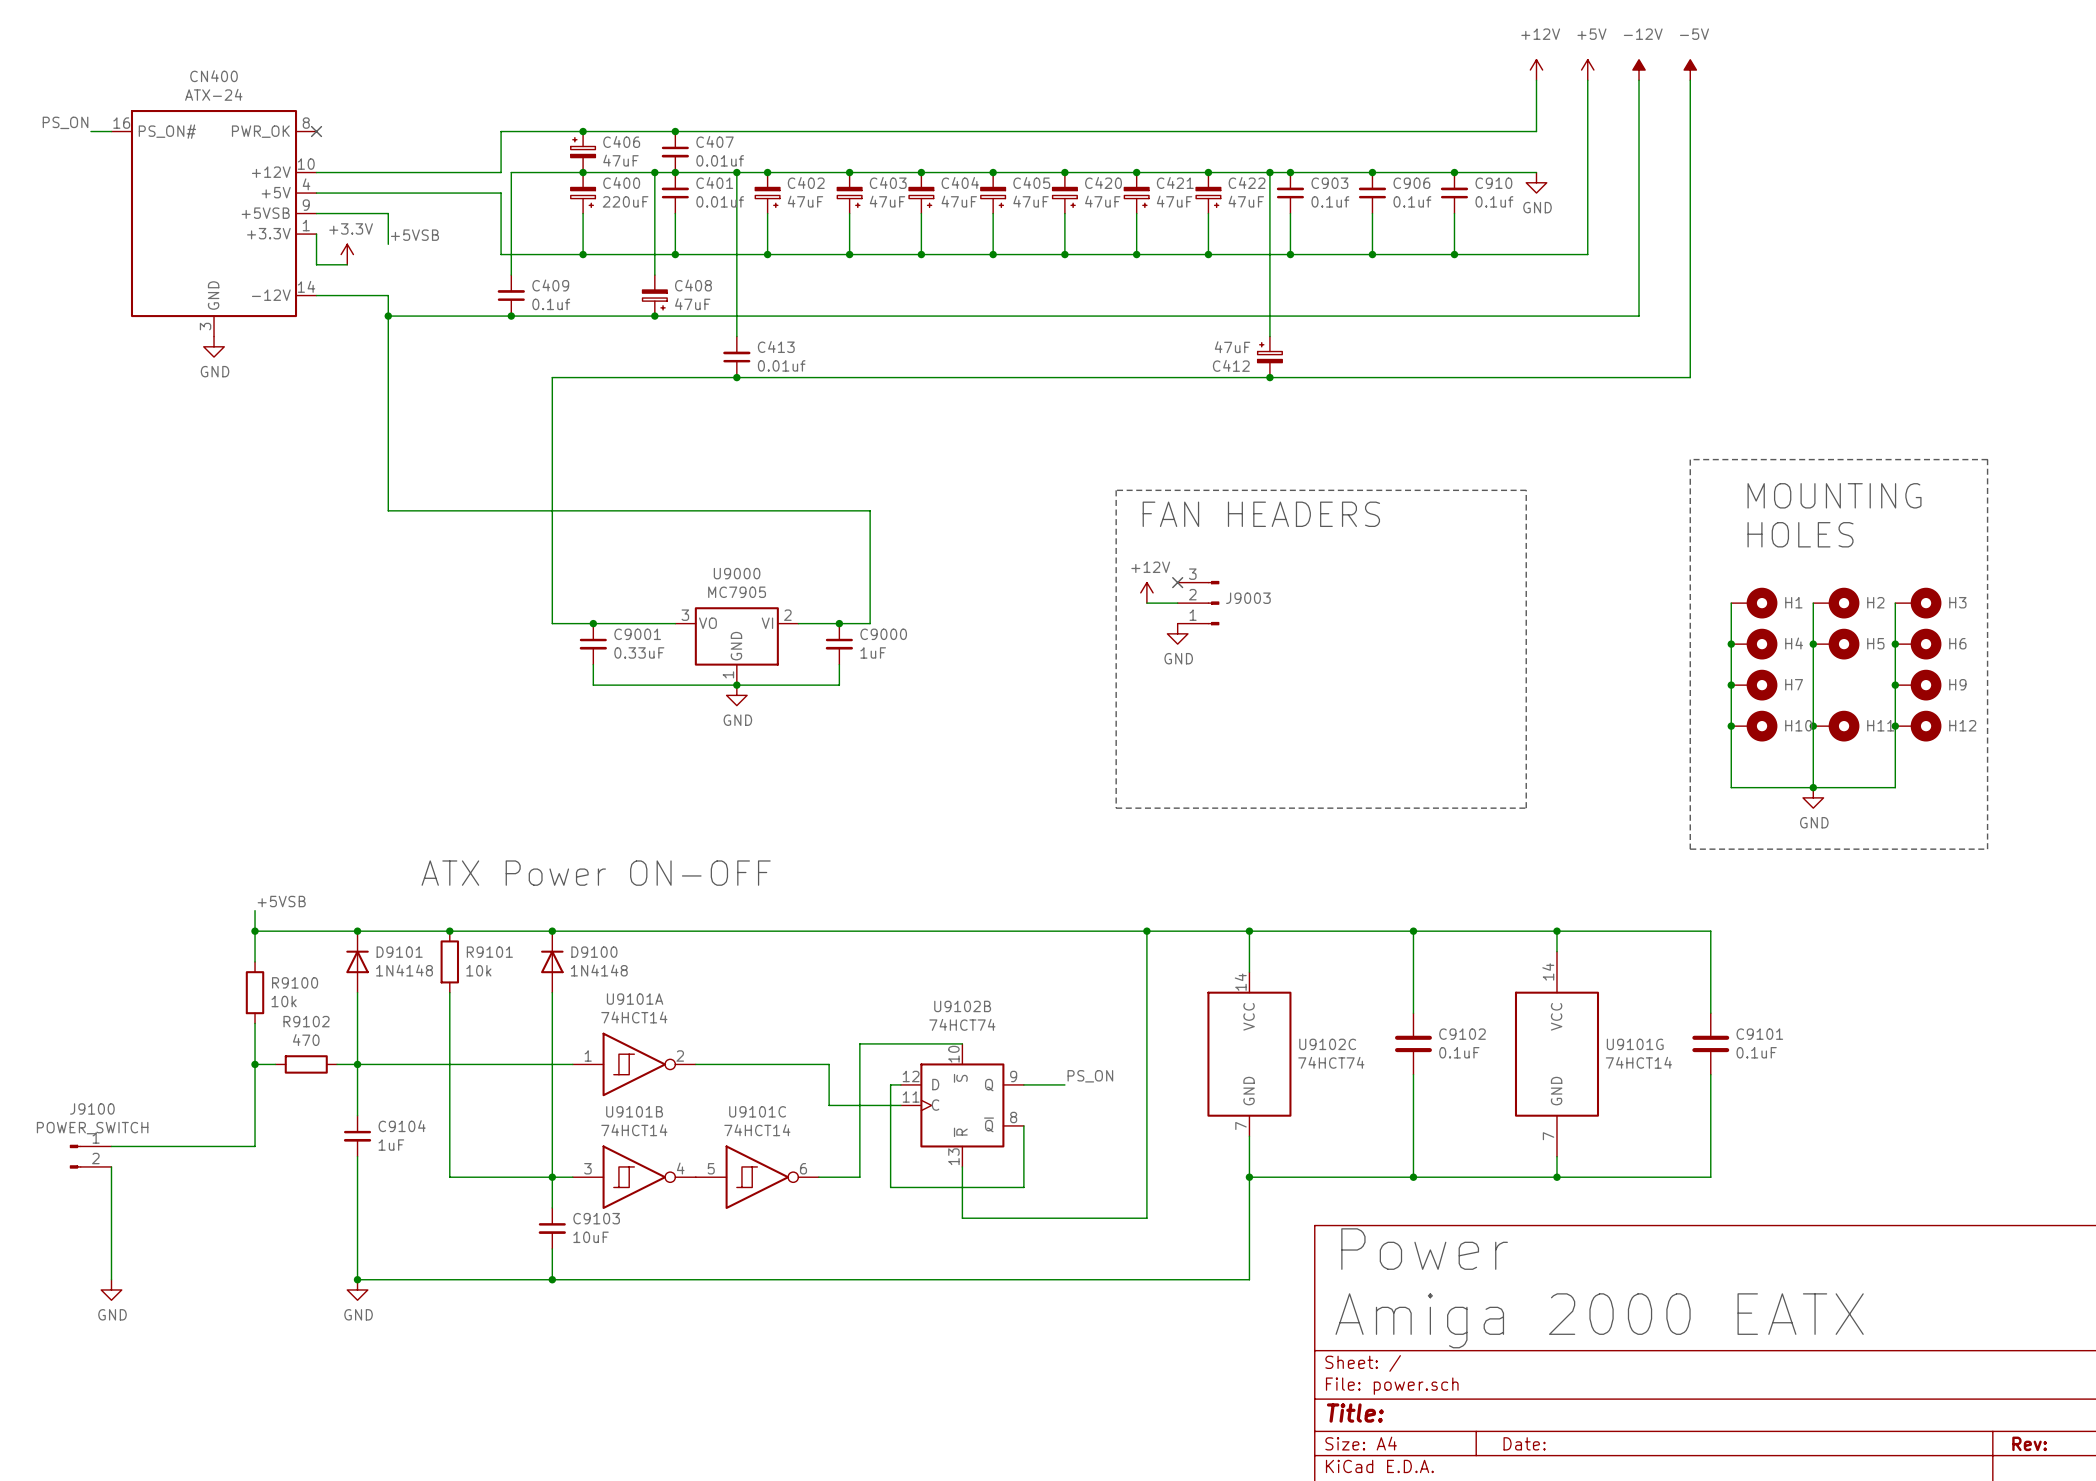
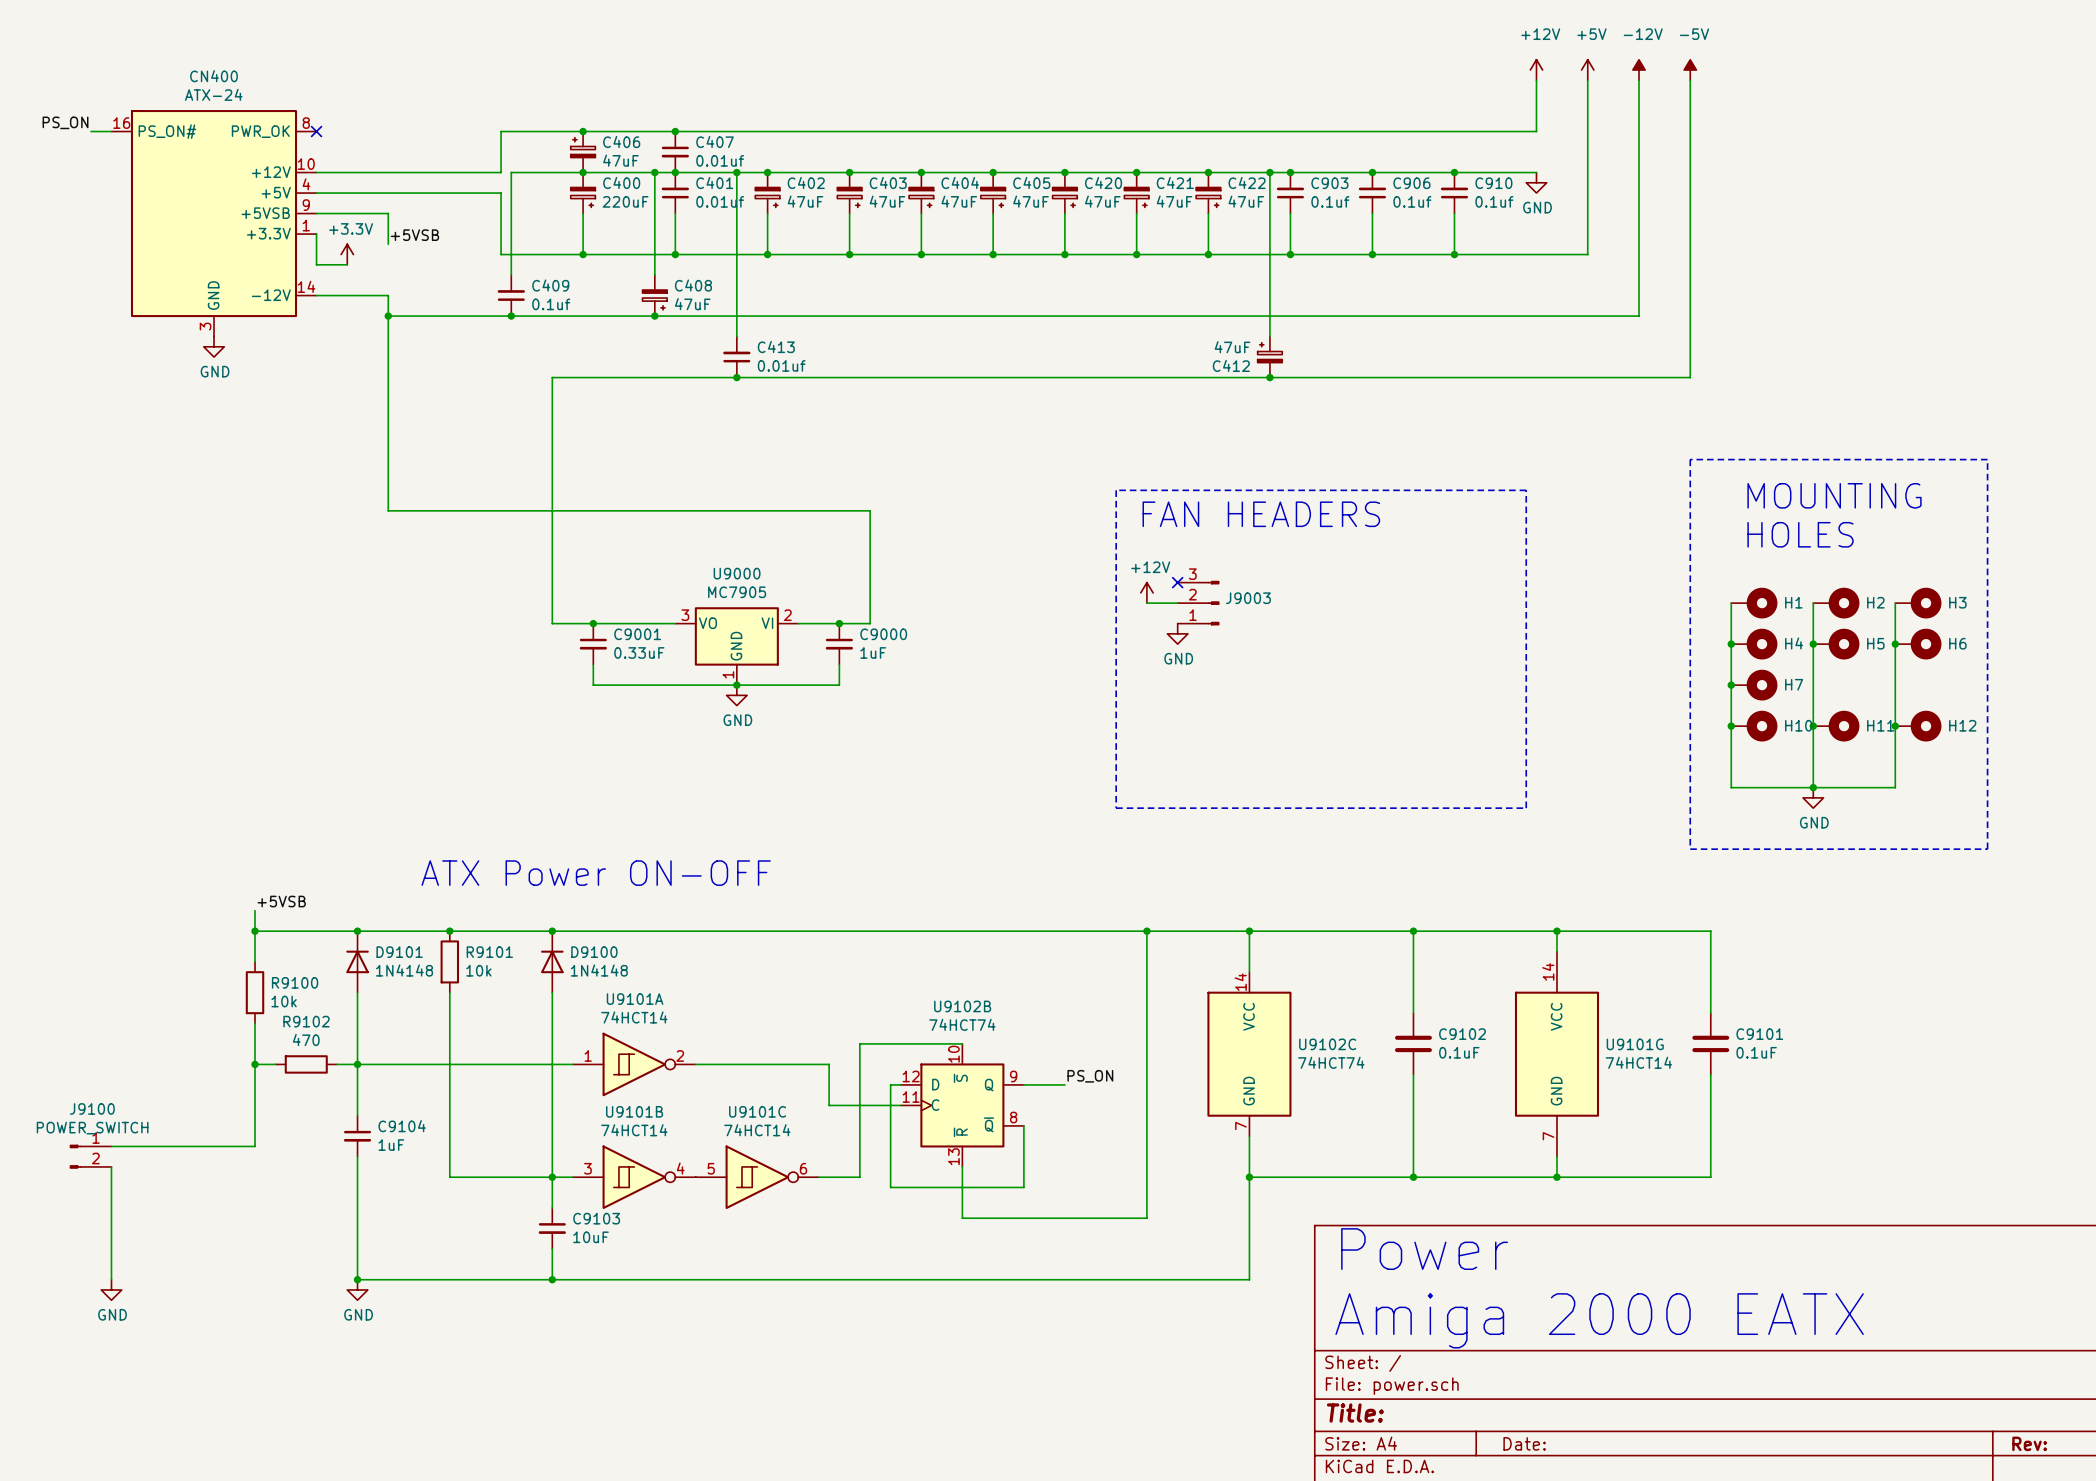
junction: (1895, 685) -> none
H9: (1918, 685) -> none

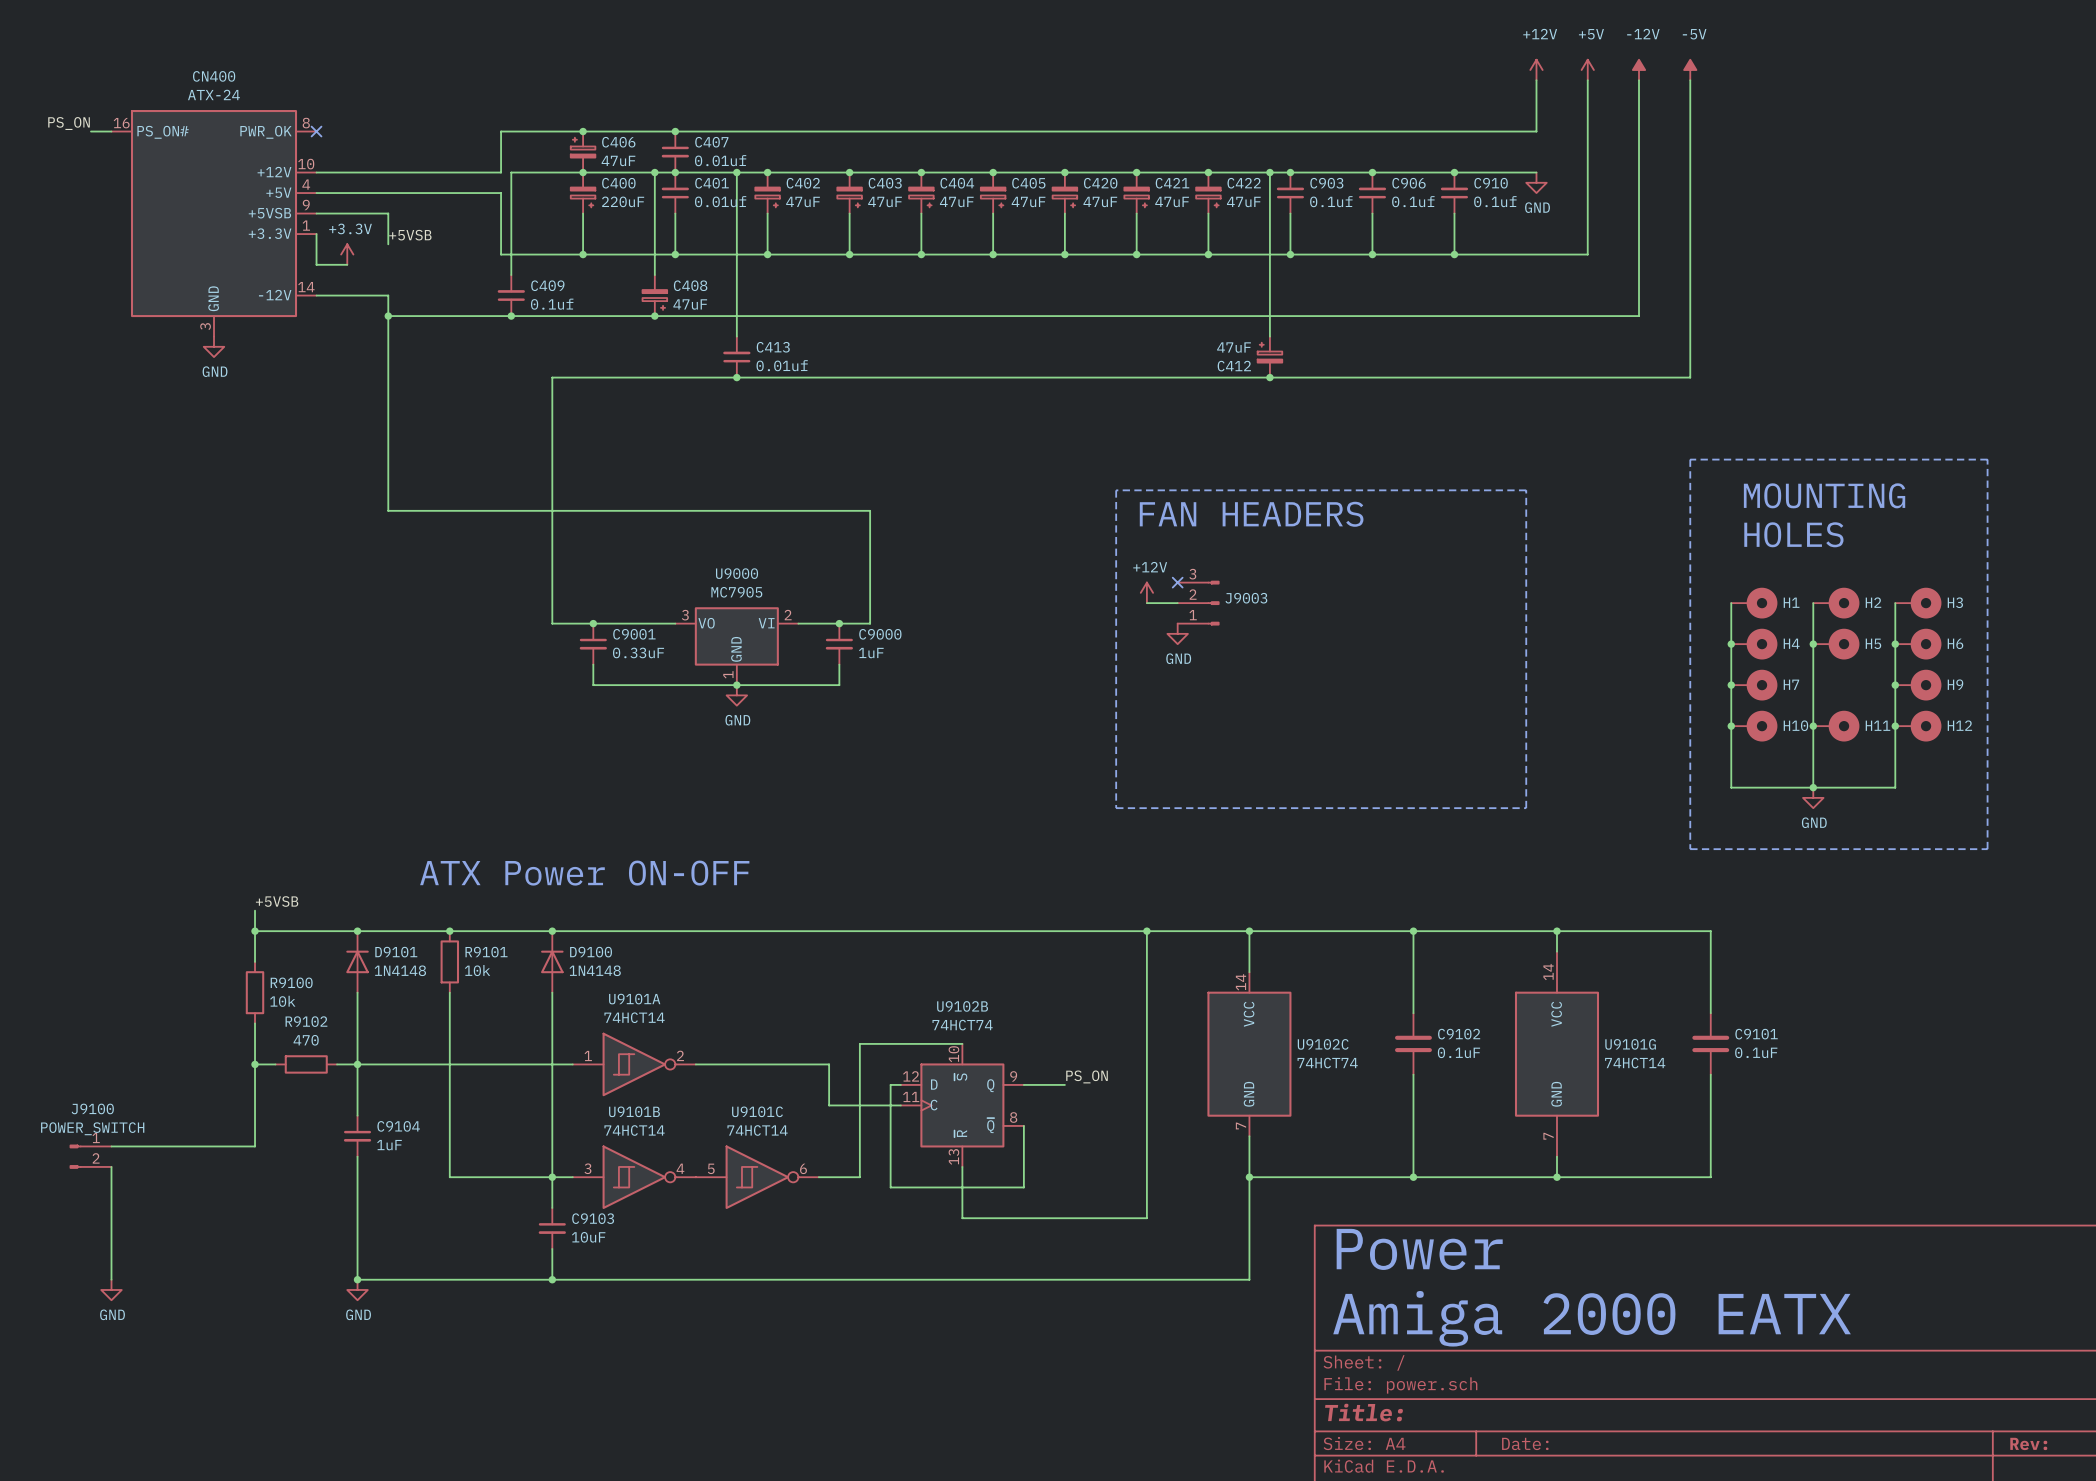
junction: none -> (1895, 685)
H9: none -> (1918, 685)

